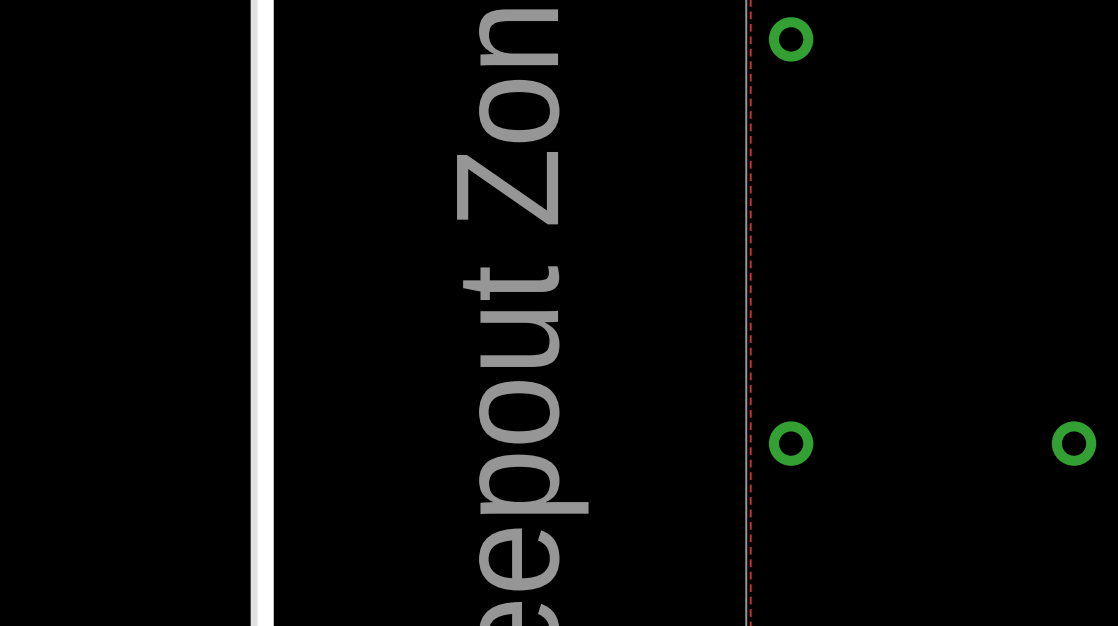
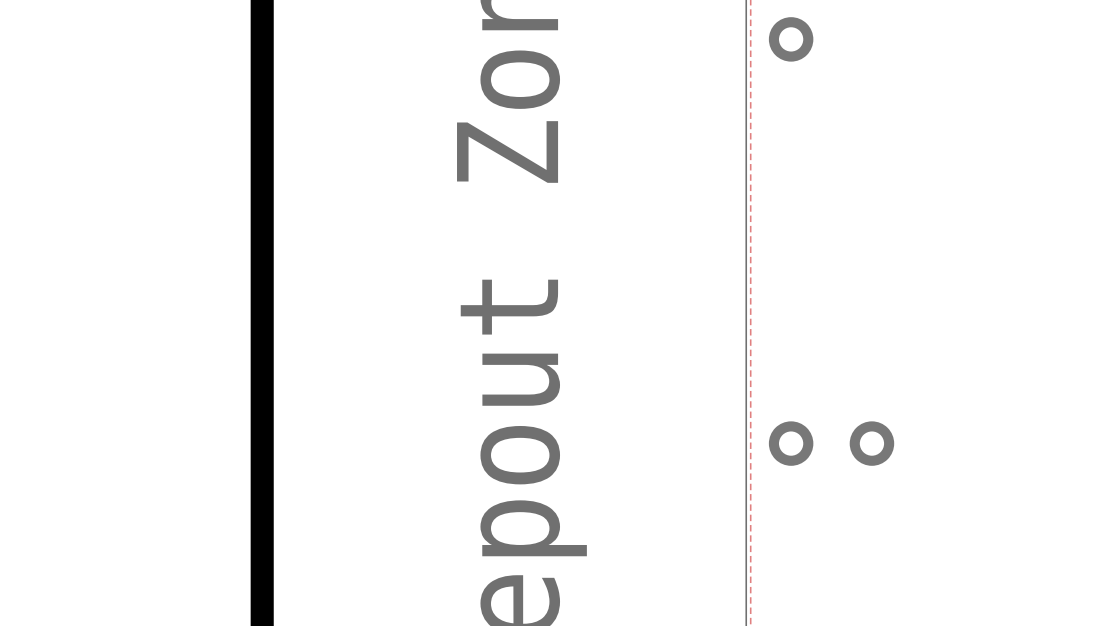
via position: (1074, 443) -> (871, 443)

